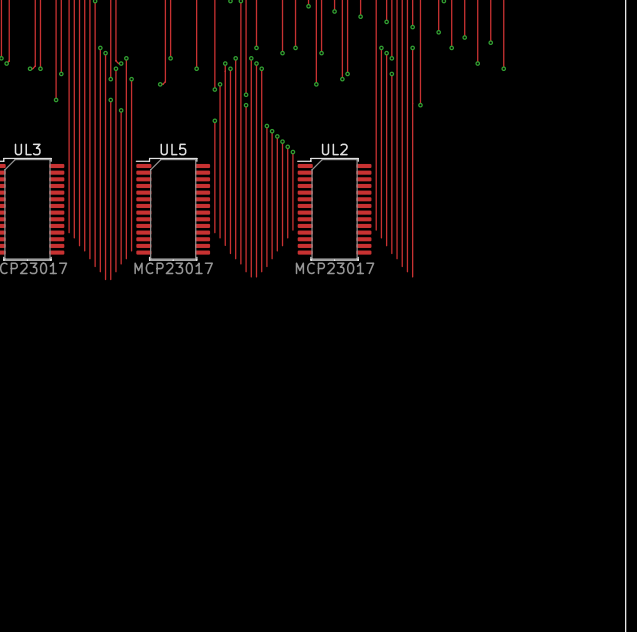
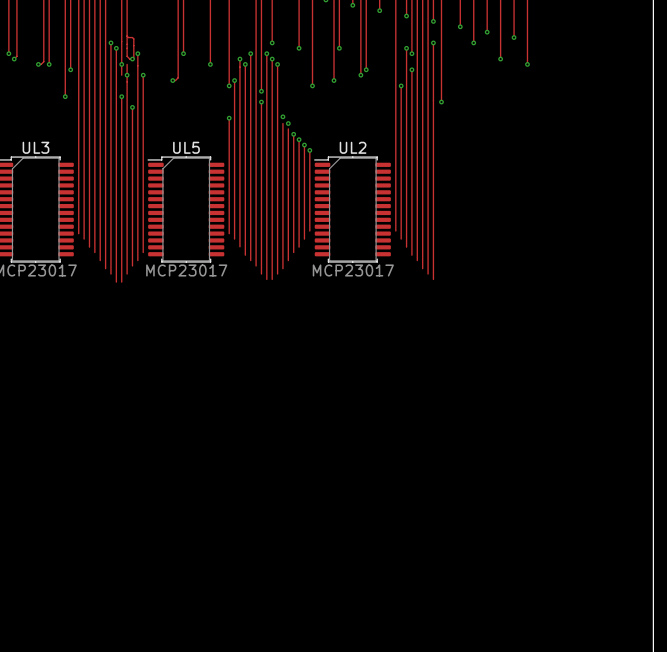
track: none -> (127, 36) (133, 38) (133, 59)
via: (295, 47) -> none
track: (381, 47) (381, 89) -> (312, 42) (312, 85)
via position: (381, 47) -> (401, 85)
via: none -> (121, 64)
via: (115, 68) -> none
via: (110, 79) -> none
via: none -> (127, 75)
via: none -> (312, 85)
via: none -> (282, 116)
via: (266, 126) -> none
via: none -> (288, 123)
via: (272, 131) -> none

